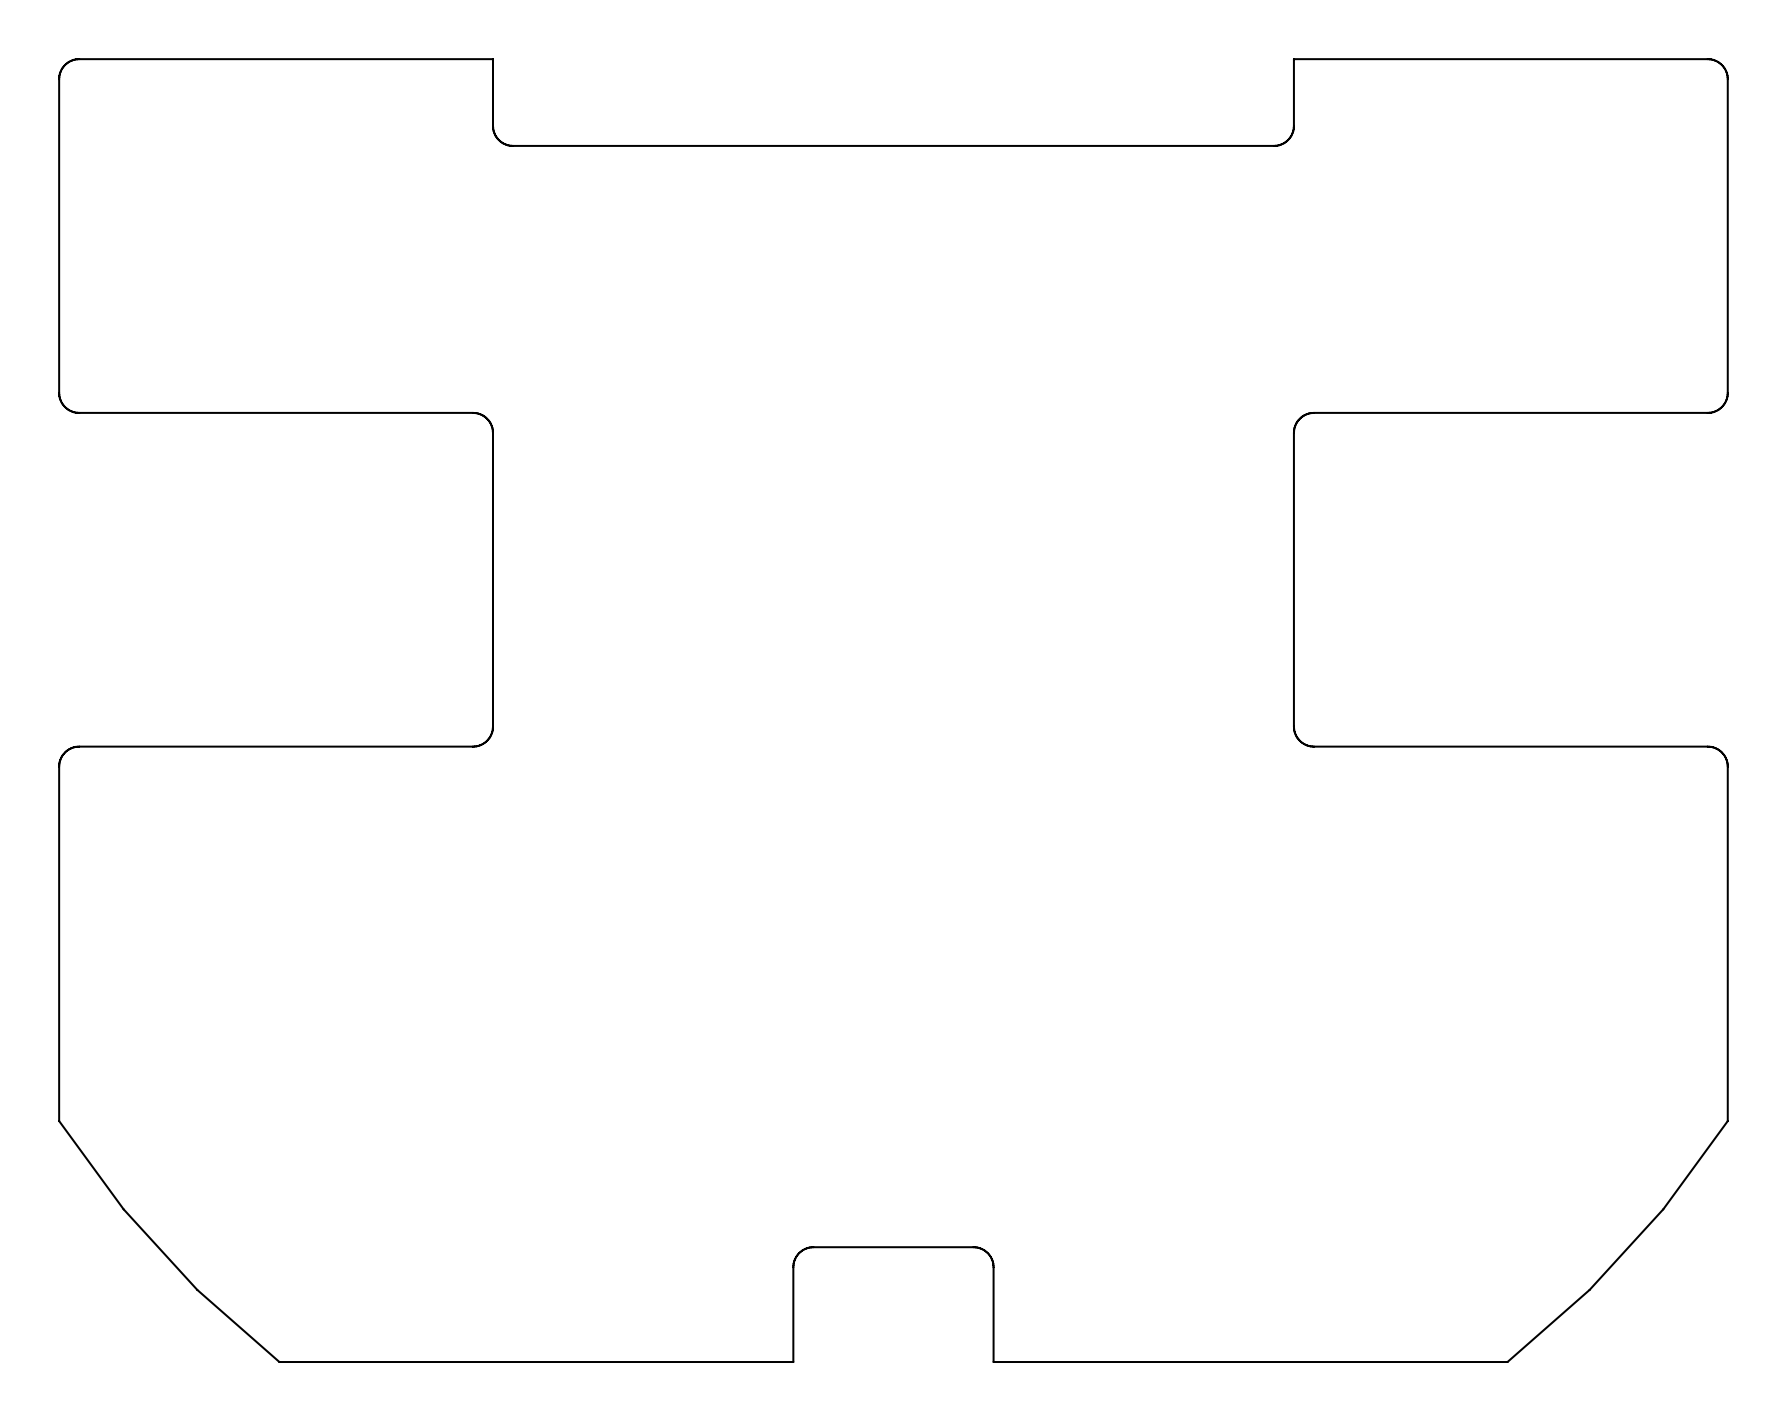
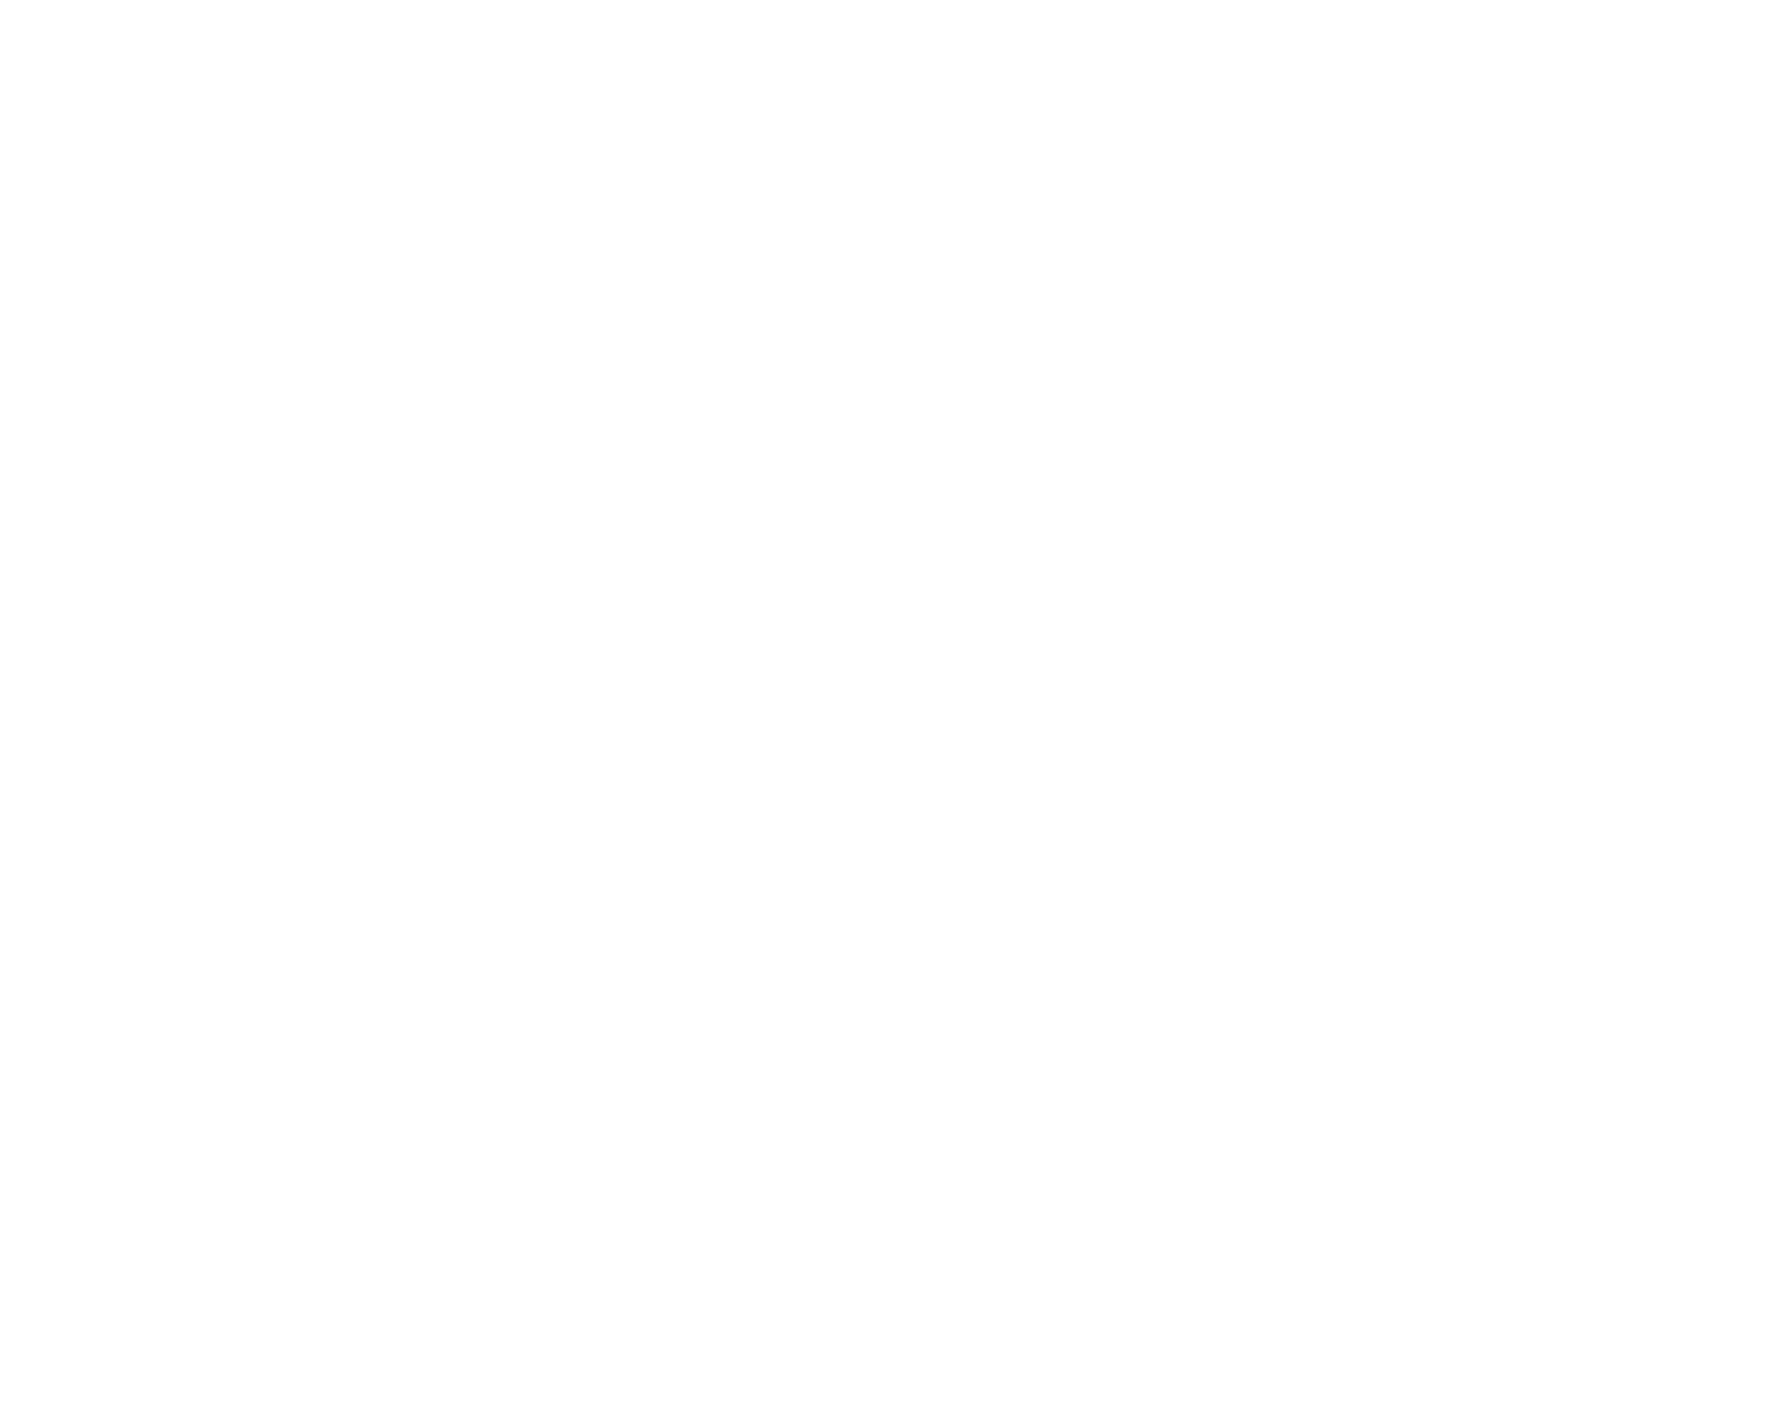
board edge: (1707, 59) (1293, 59) (1293, 129) (1286, 141) (1273, 145) (513, 145) (500, 141) (493, 129) (492, 59) (79, 59) (67, 62) (61, 69) (59, 79) (59, 392) (62, 404) (69, 410) (79, 412) (472, 412) (484, 416) (490, 422) (492, 432) (492, 726) (491, 733) (487, 740) (479, 745) (472, 746) (79, 746) (72, 747) (65, 752) (60, 759) (59, 766) (59, 1121) (123, 1209) (197, 1289) (279, 1362) (793, 1362) (793, 1263) (800, 1251) (813, 1247) (973, 1247) (985, 1250) (990, 1257) (993, 1267) (993, 1362) (1507, 1362) (1589, 1289) (1663, 1209) (1727, 1121) (1727, 763) (1720, 751) (1707, 746) (1313, 746) (1302, 743) (1296, 736) (1293, 726) (1294, 429) (1301, 417) (1313, 412) (1707, 412) (1720, 408) (1725, 401) (1727, 392) (1727, 79) (1726, 72) (1721, 65) (1714, 60) (1707, 59) -> none

